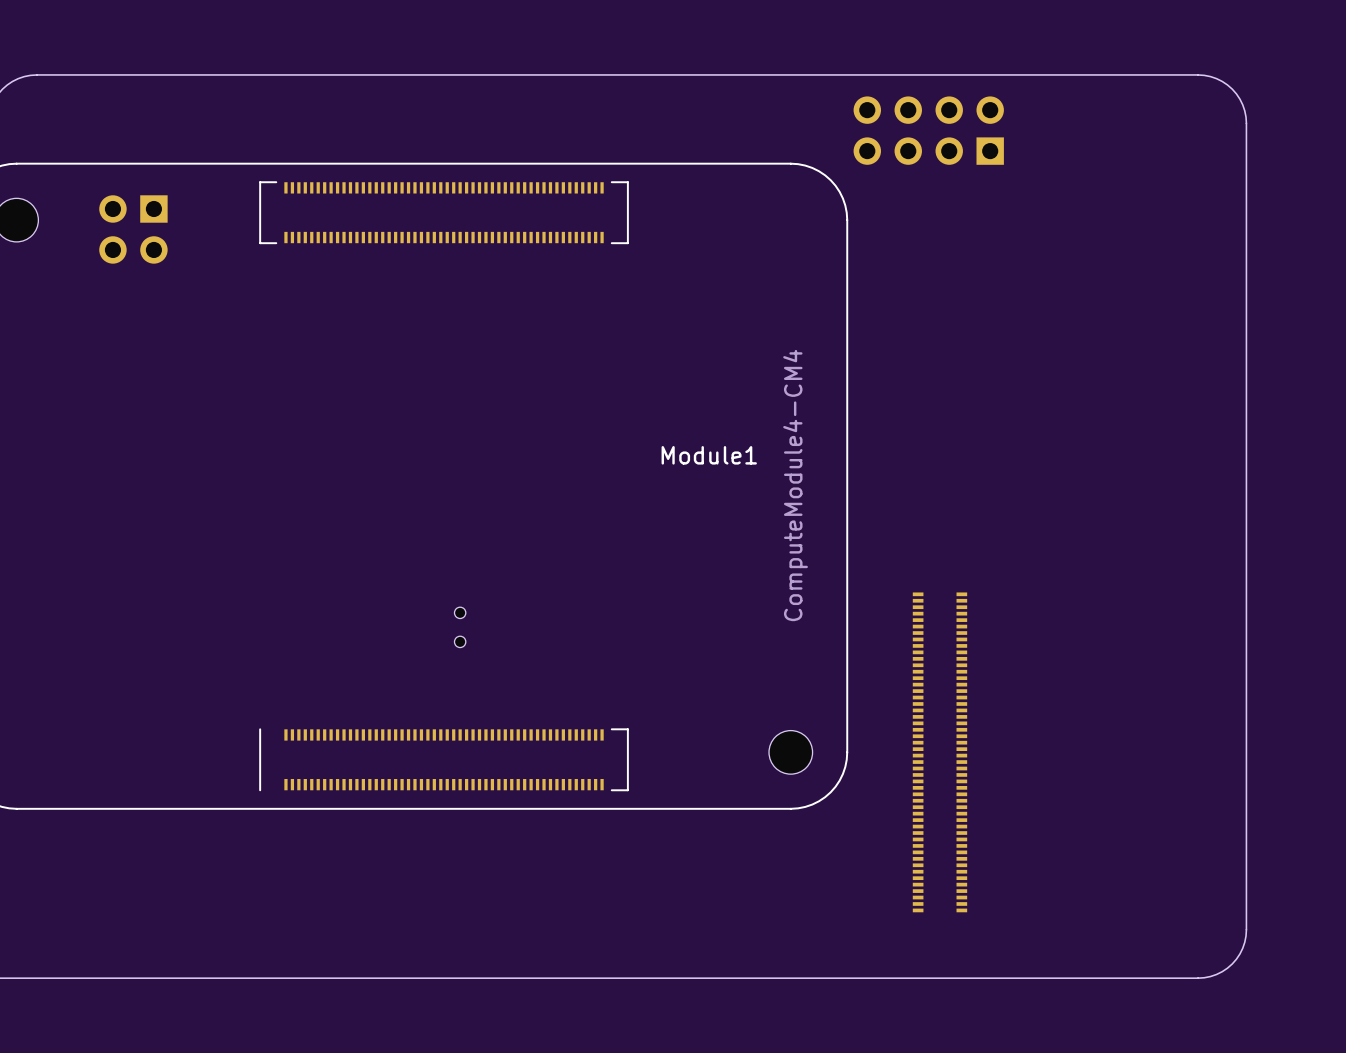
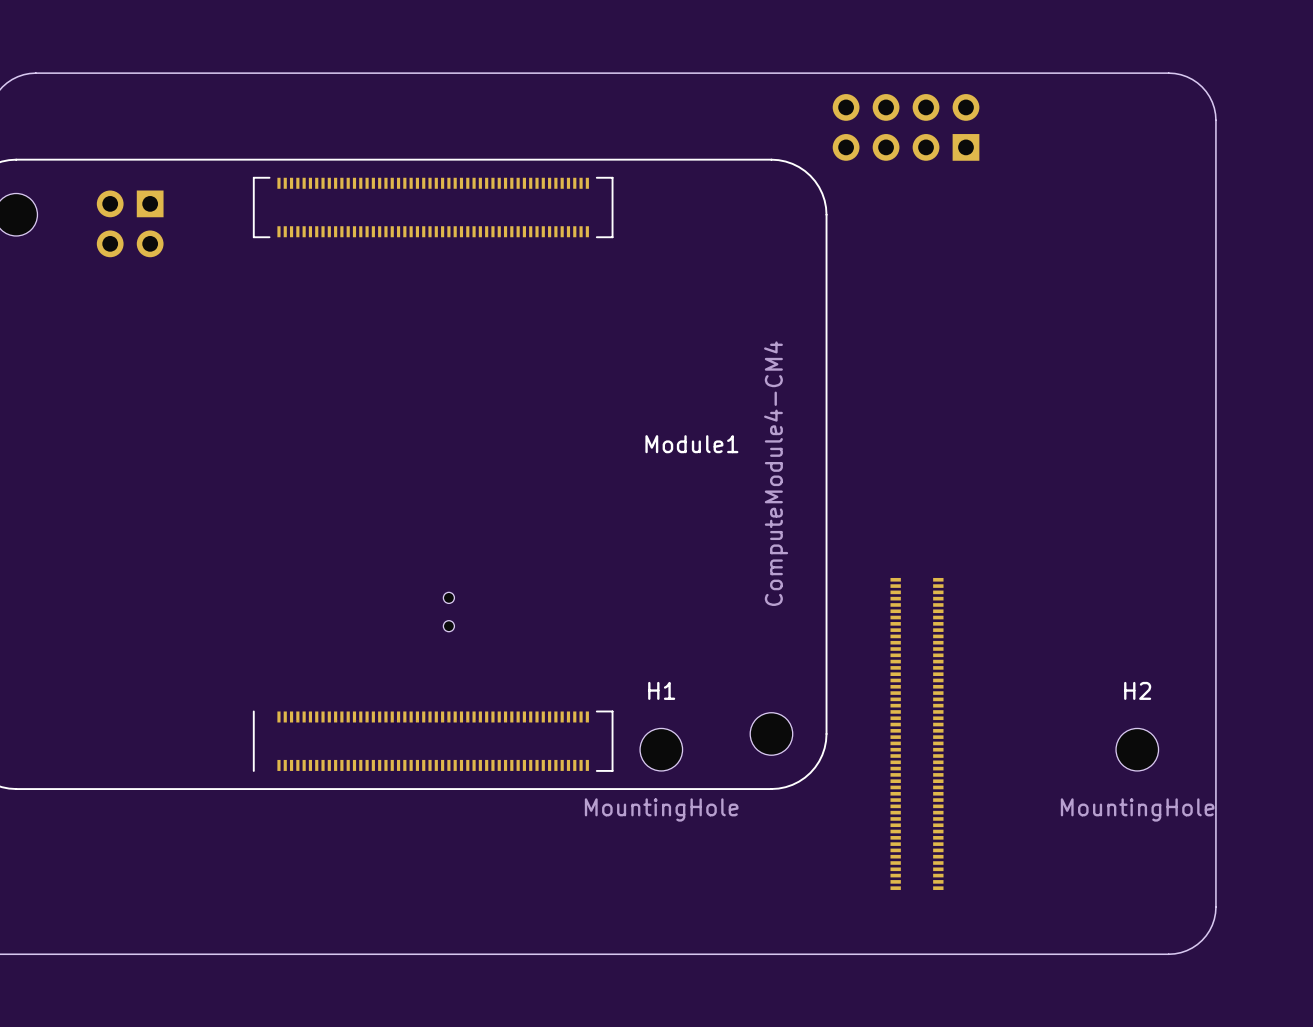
H1: none -> MountingHole (661, 749)
H2: none -> MountingHole (1137, 749)

